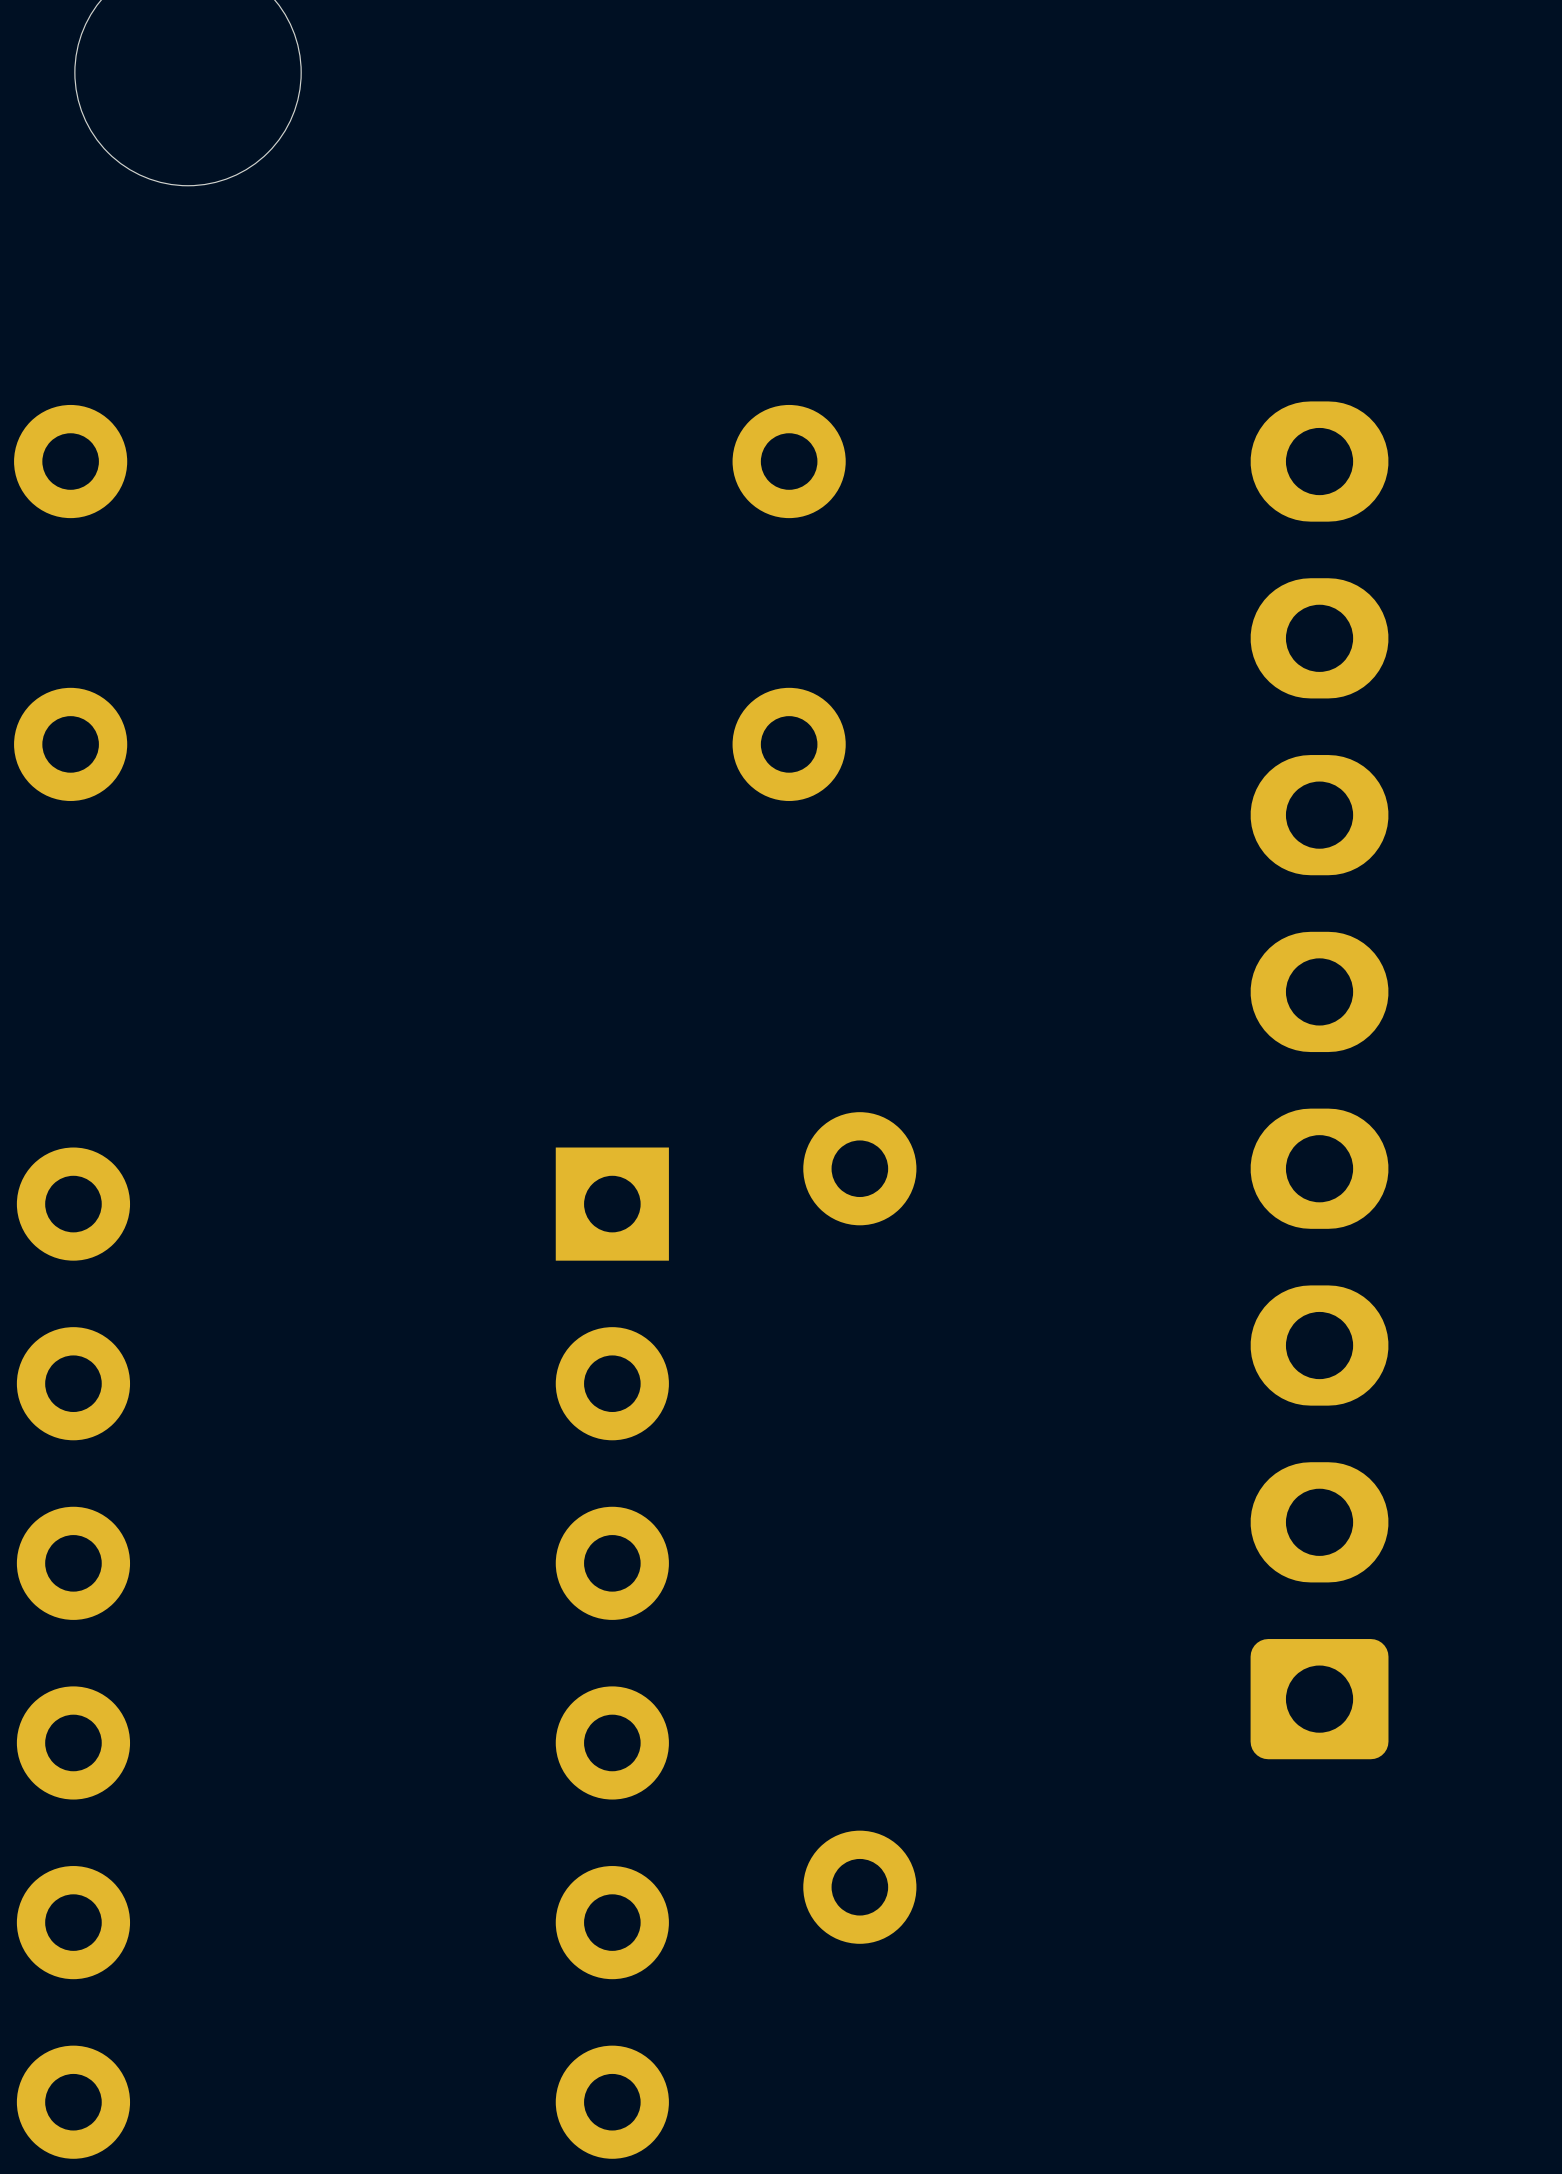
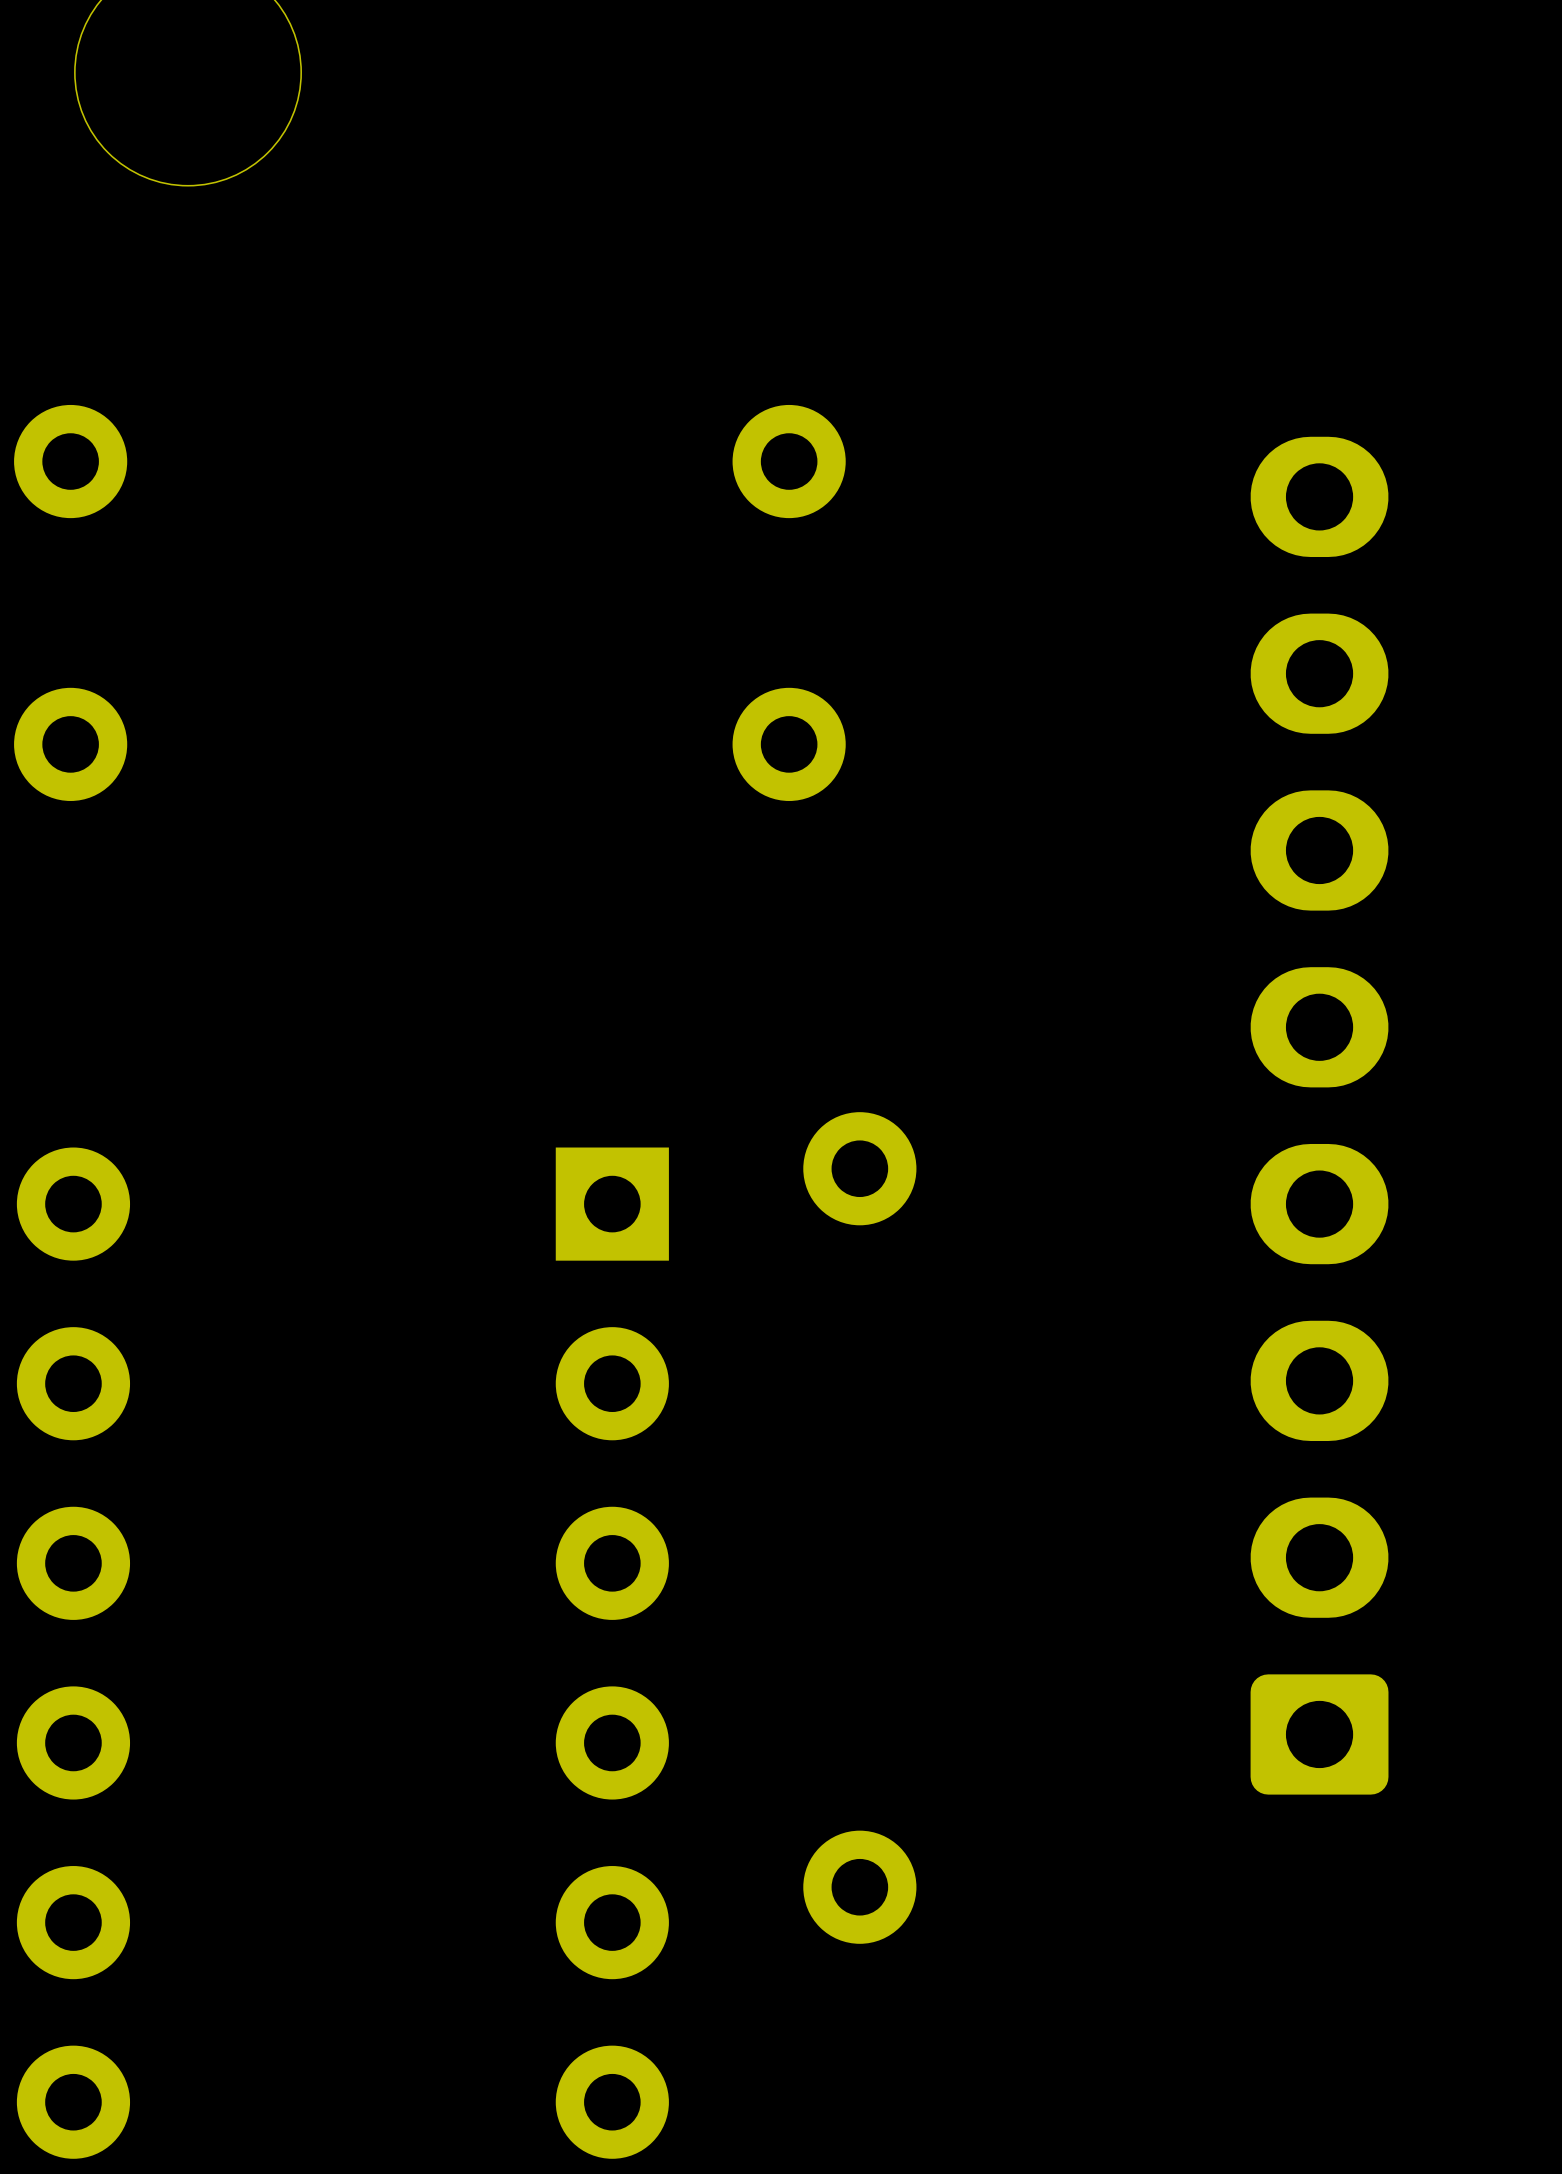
part position: (1319, 1080) -> (1319, 1115)

